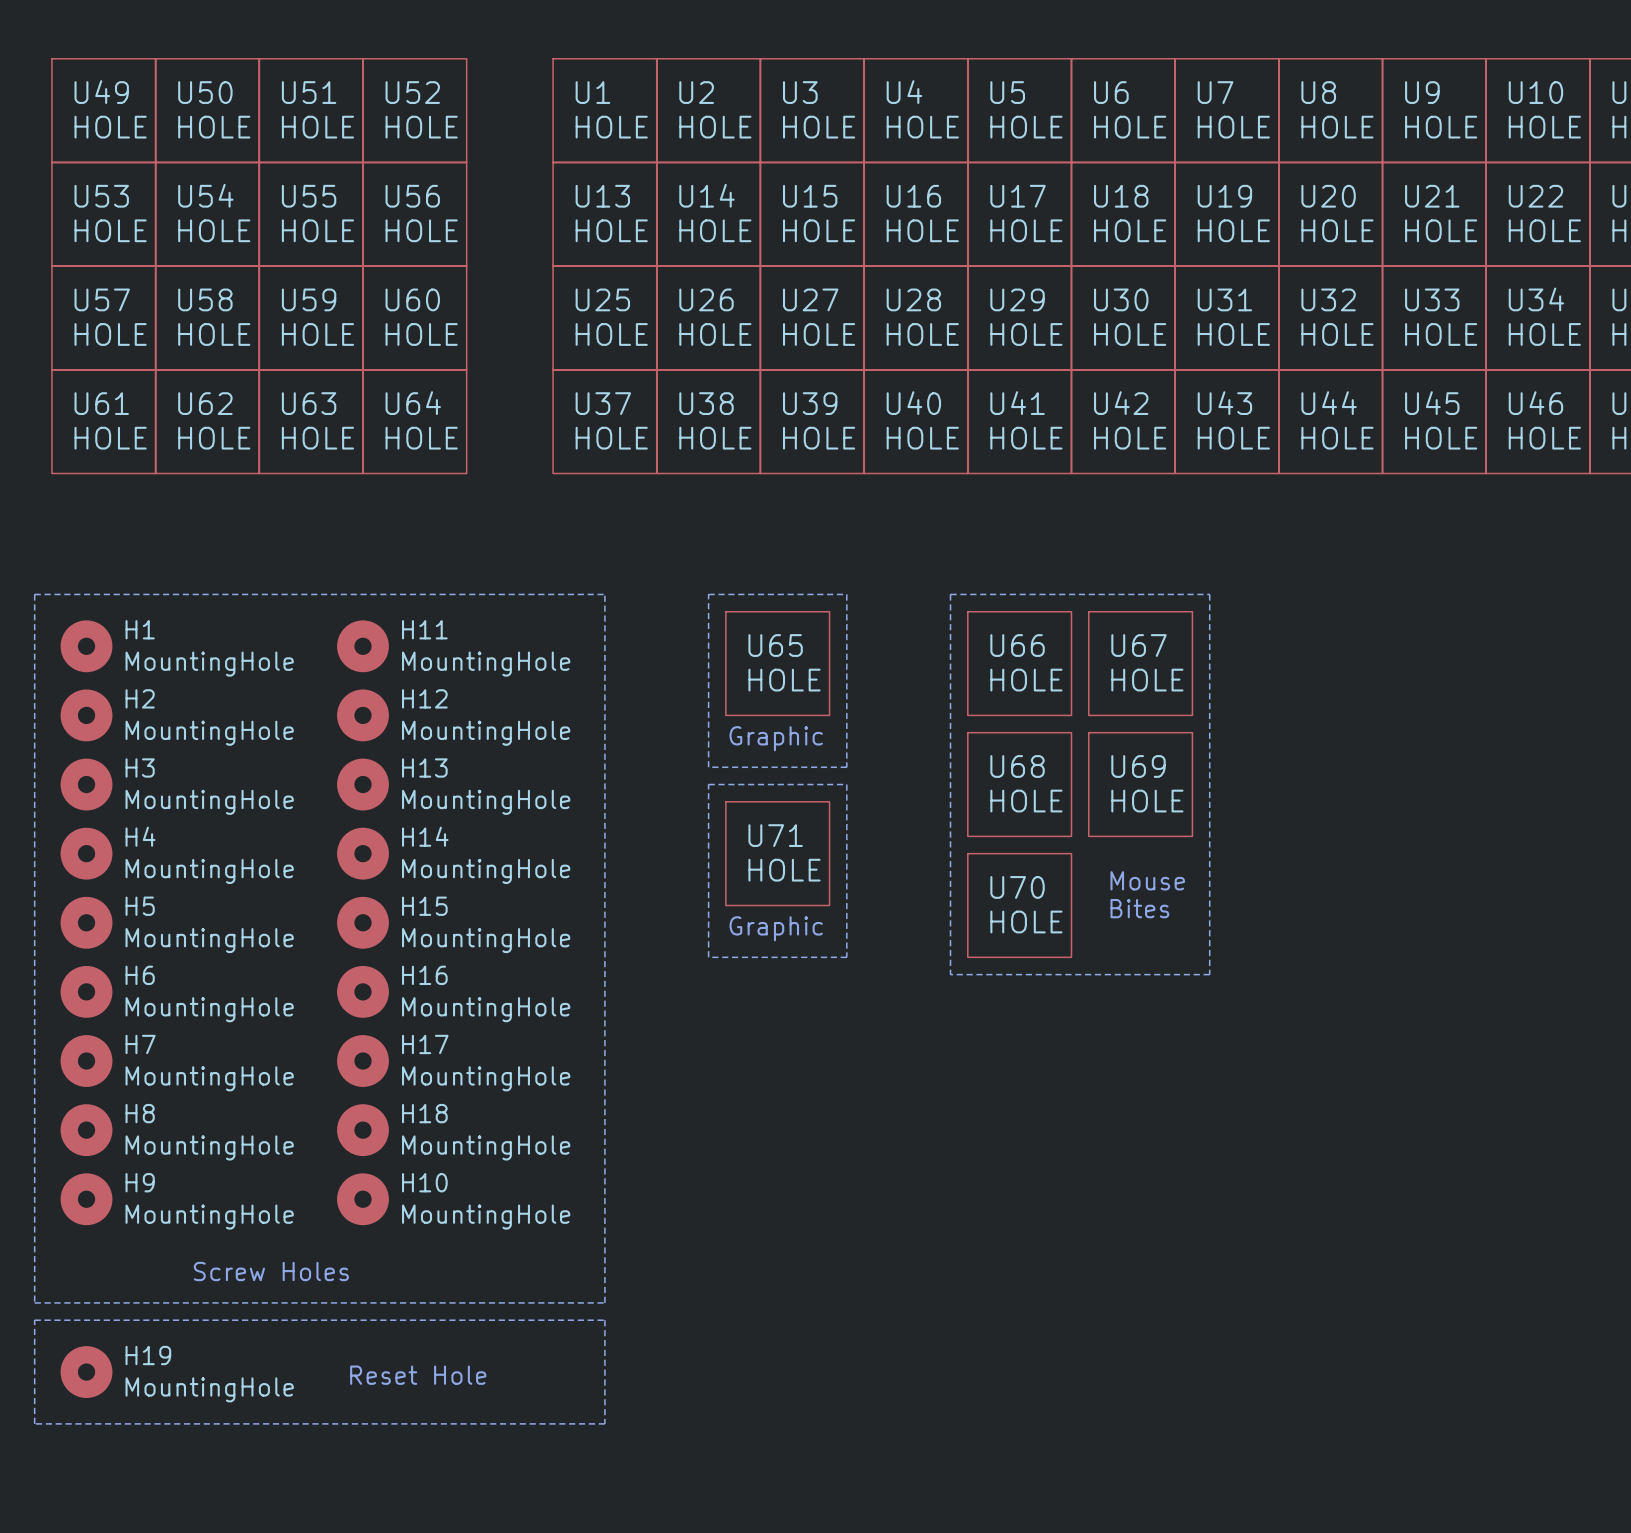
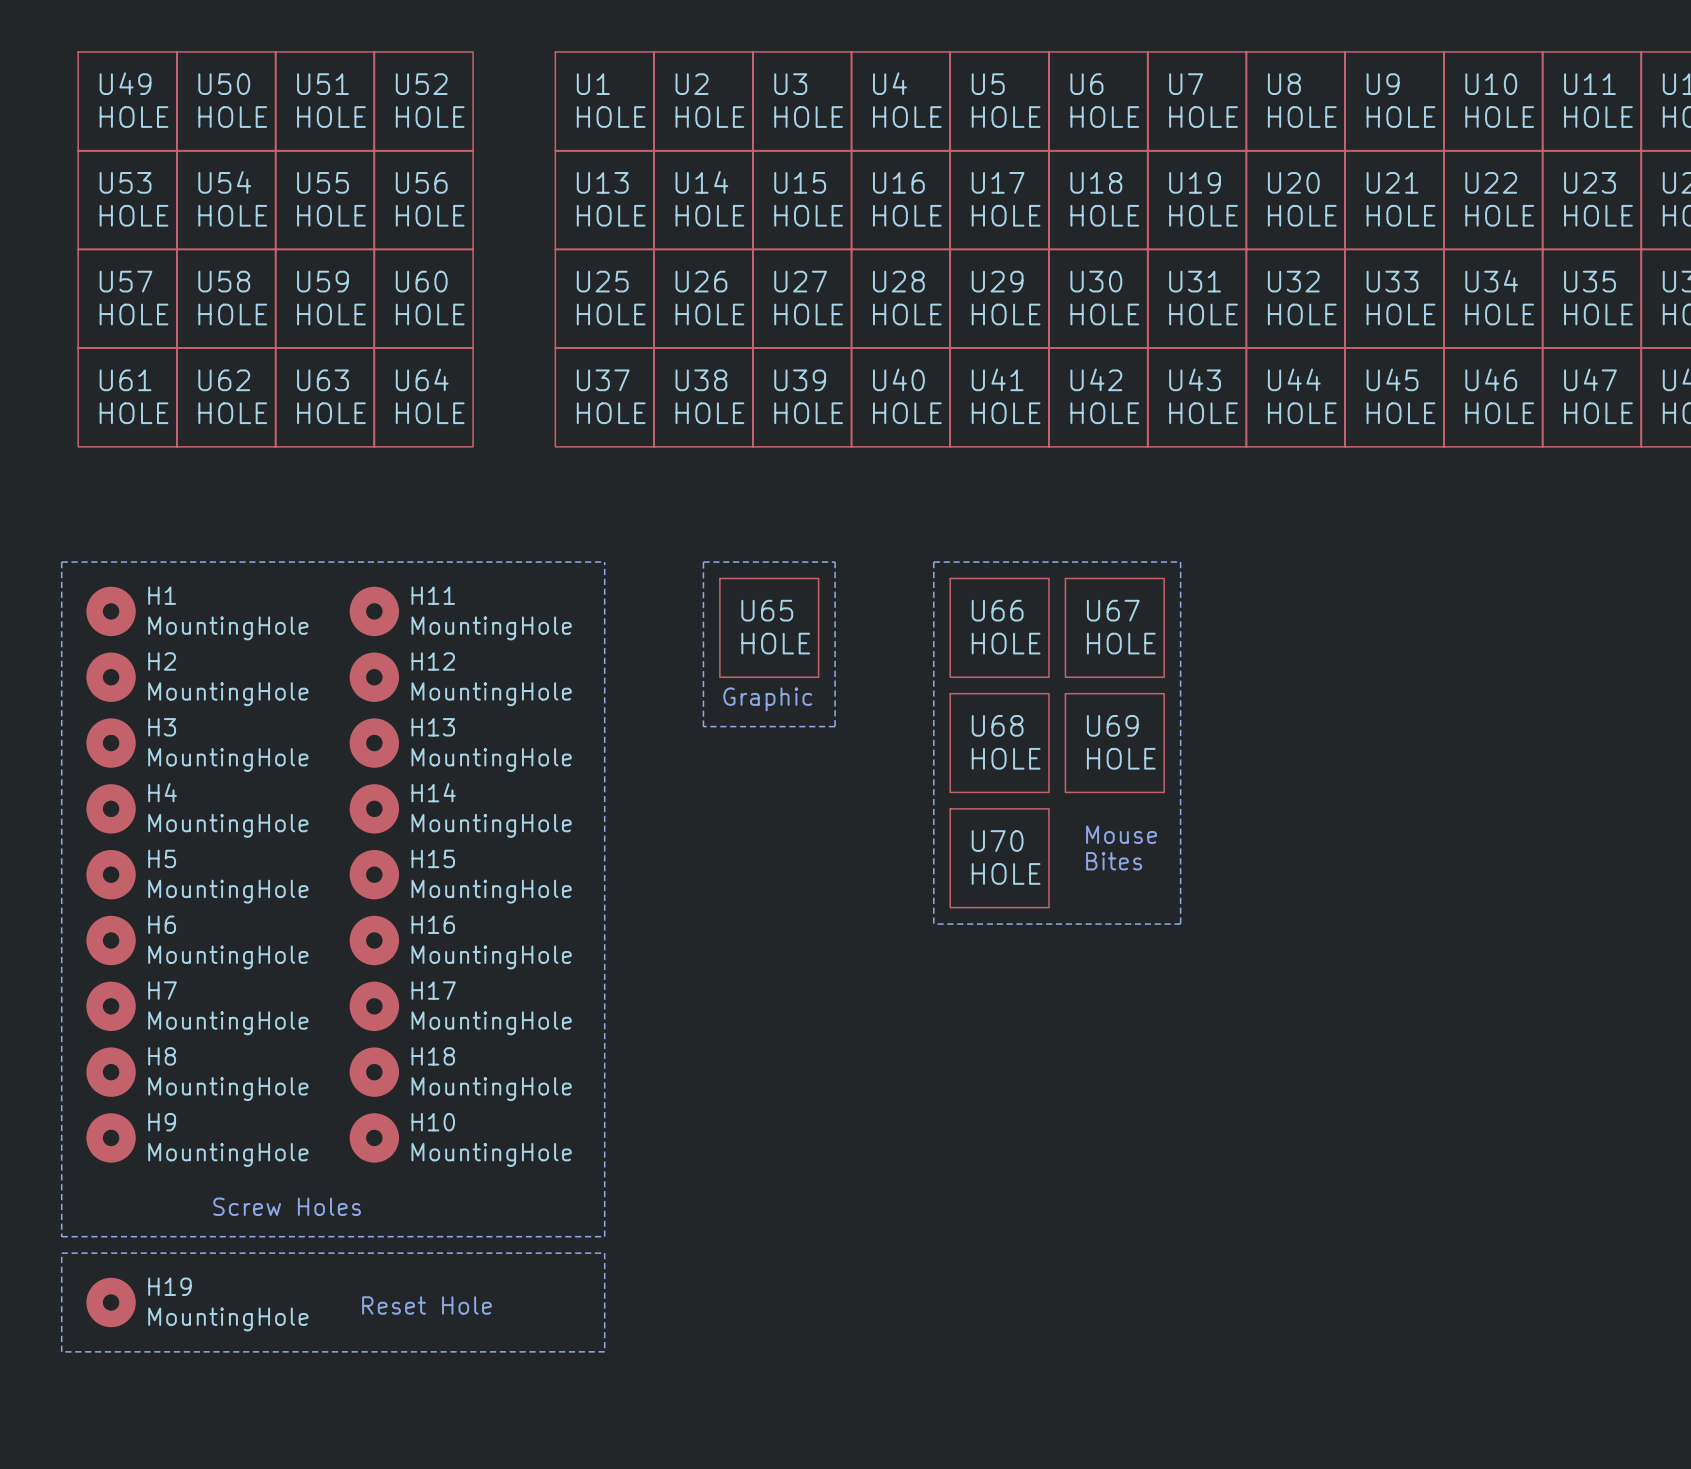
line: (708, 784) (708, 957) (846, 957) (846, 784) (708, 784) -> none
U71: HOLE (777, 853) -> none
text: Graphic (776, 928) -> none

